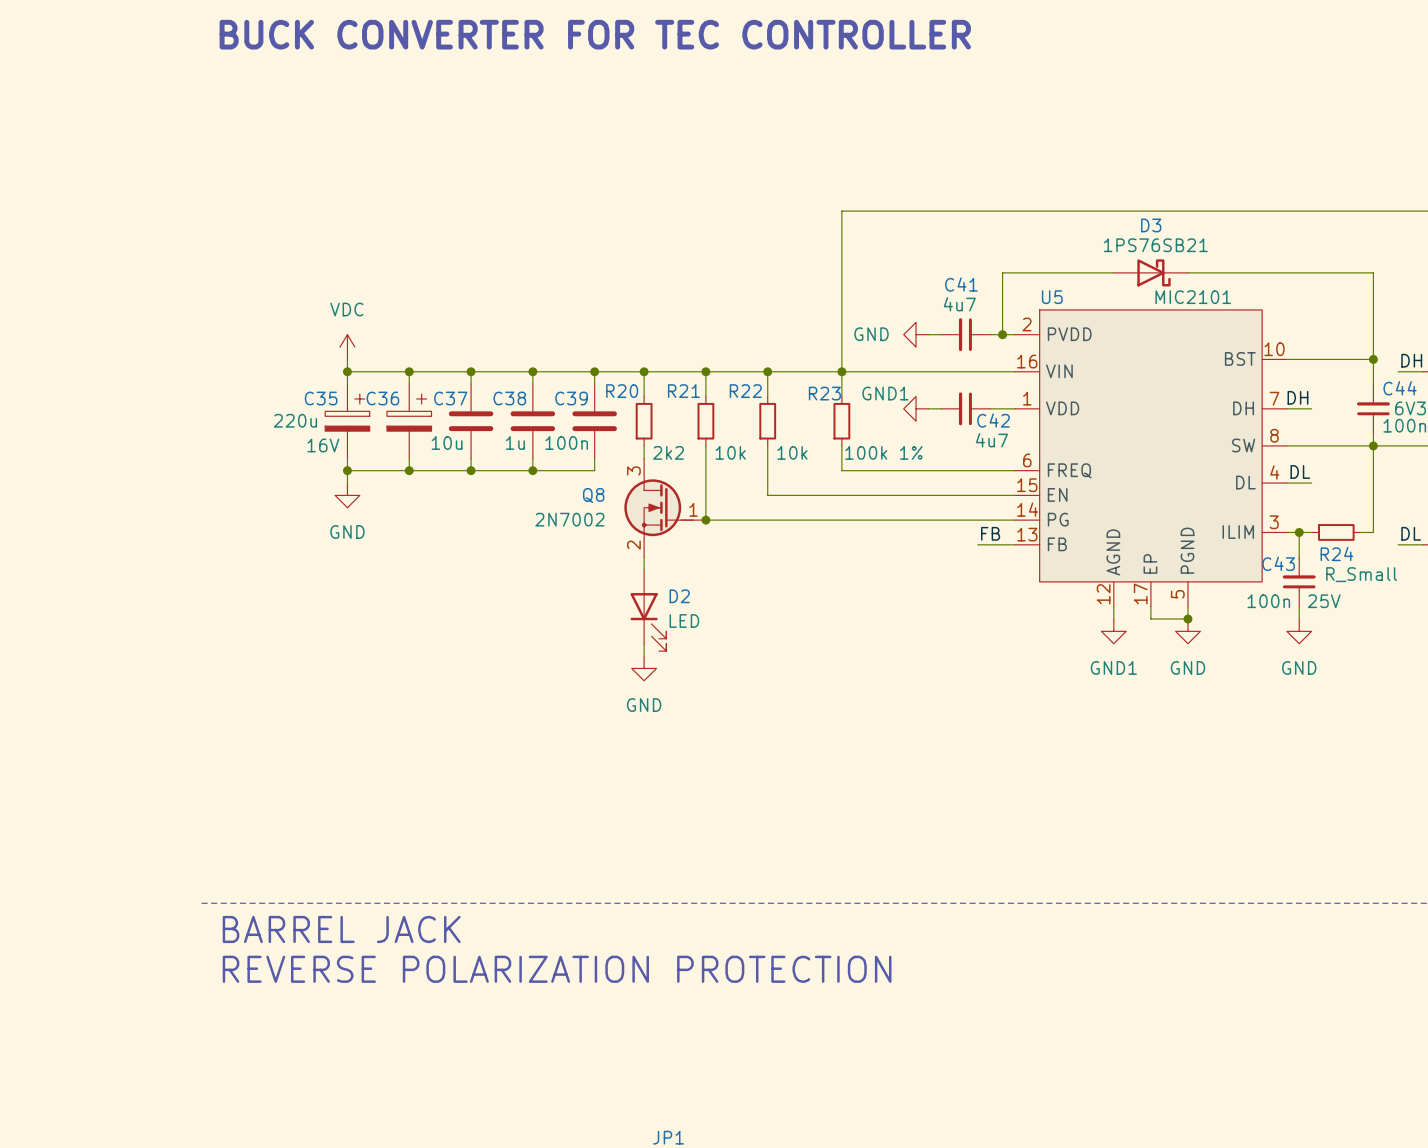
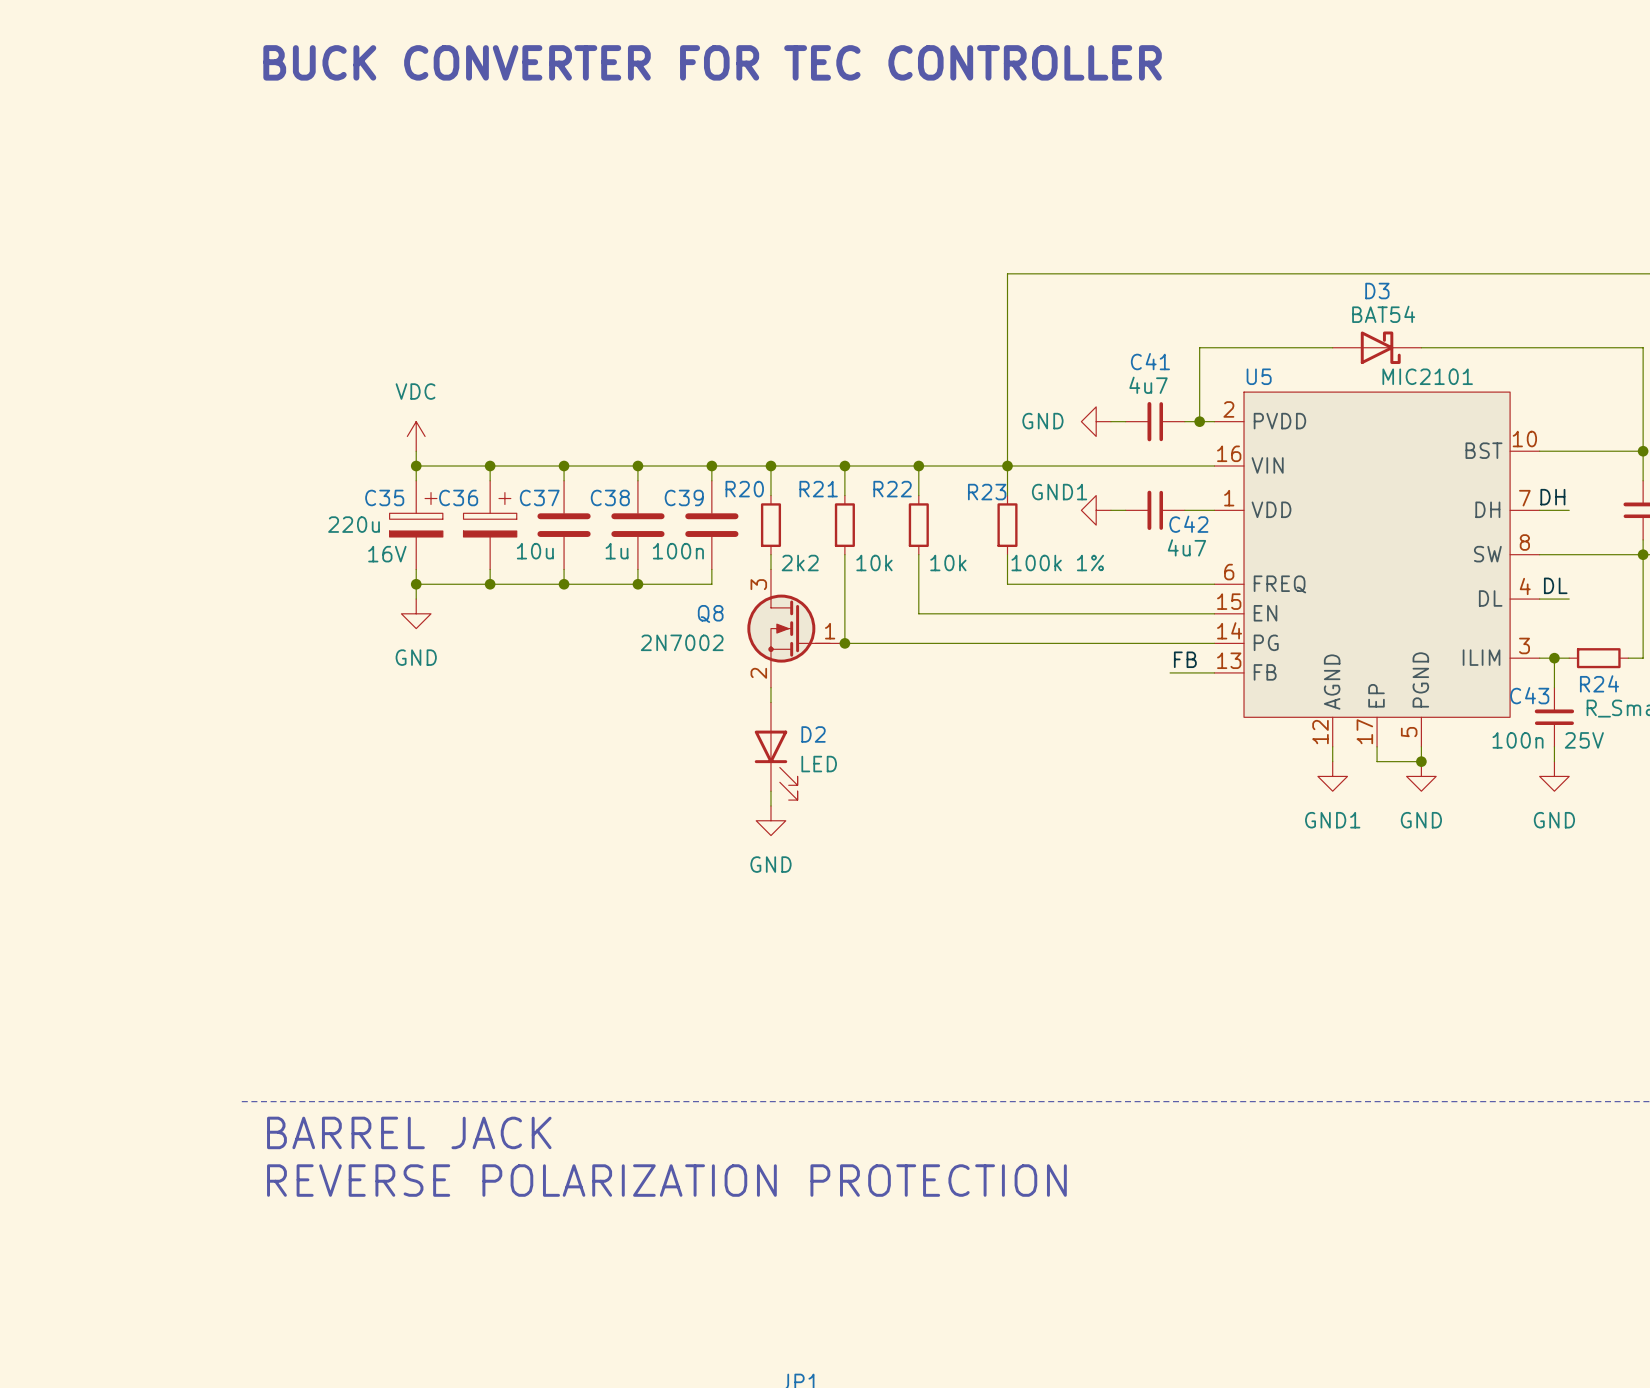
D3 value: 1PS76SB21 (1155, 245) -> BAT54 (1383, 314)

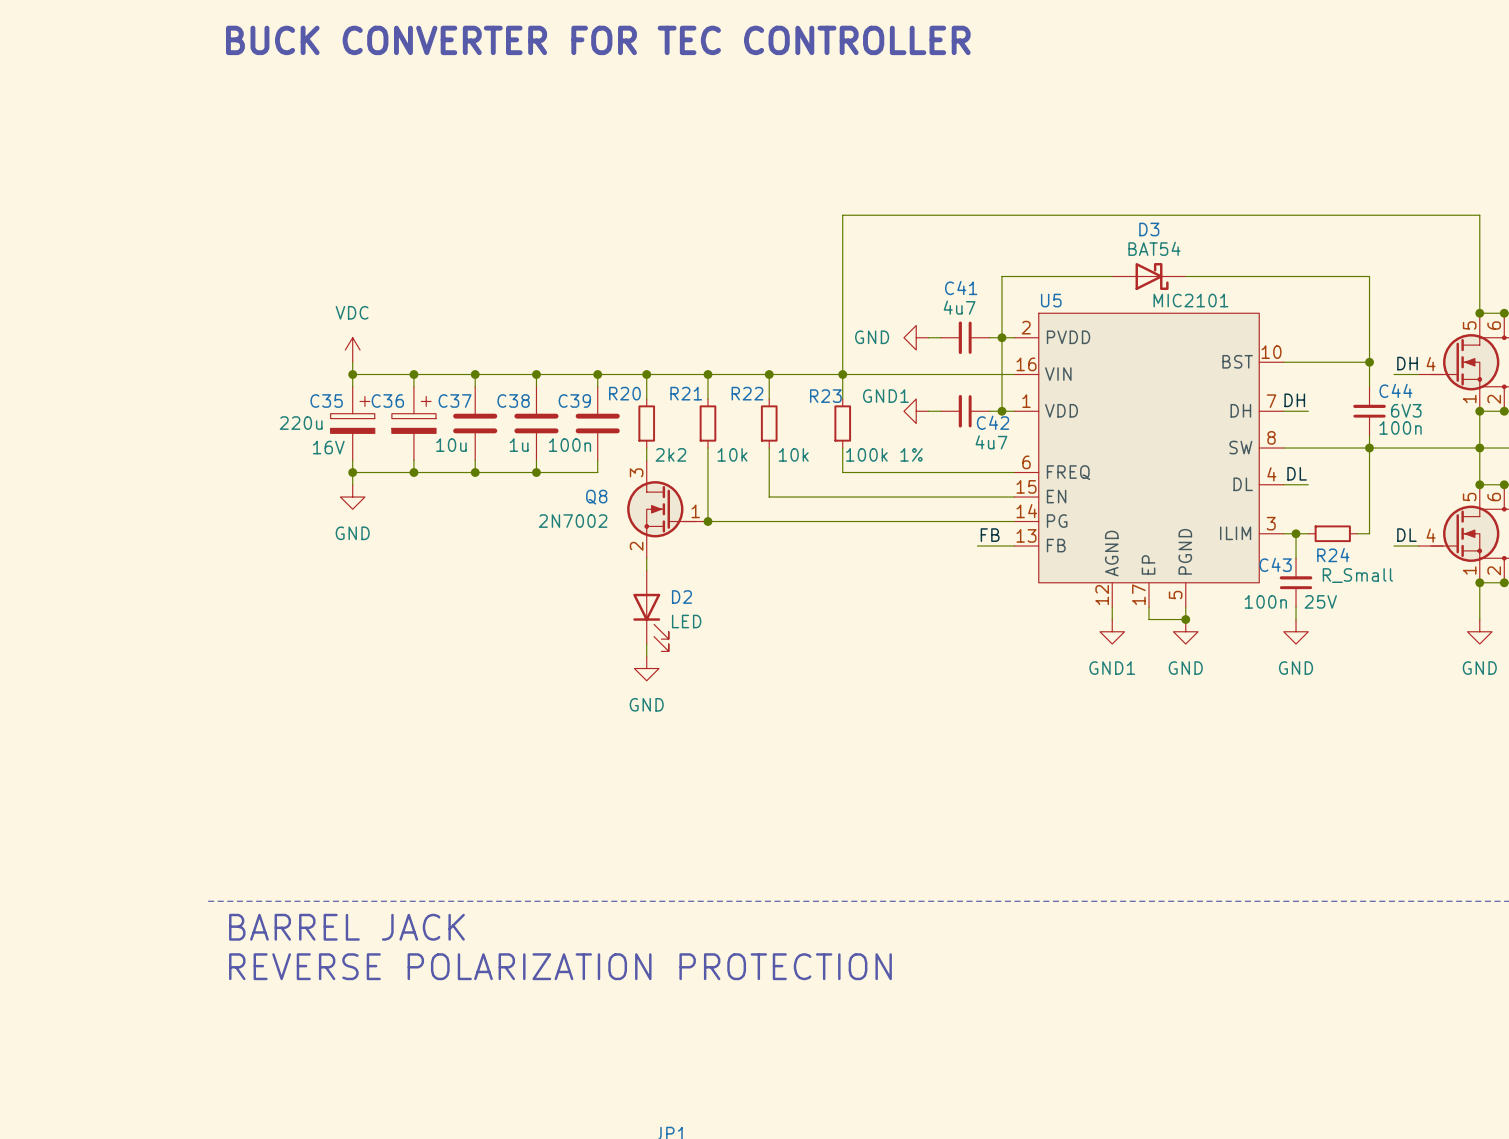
wire: none -> (1001, 337) (1001, 411)
junction: none -> (1001, 411)

